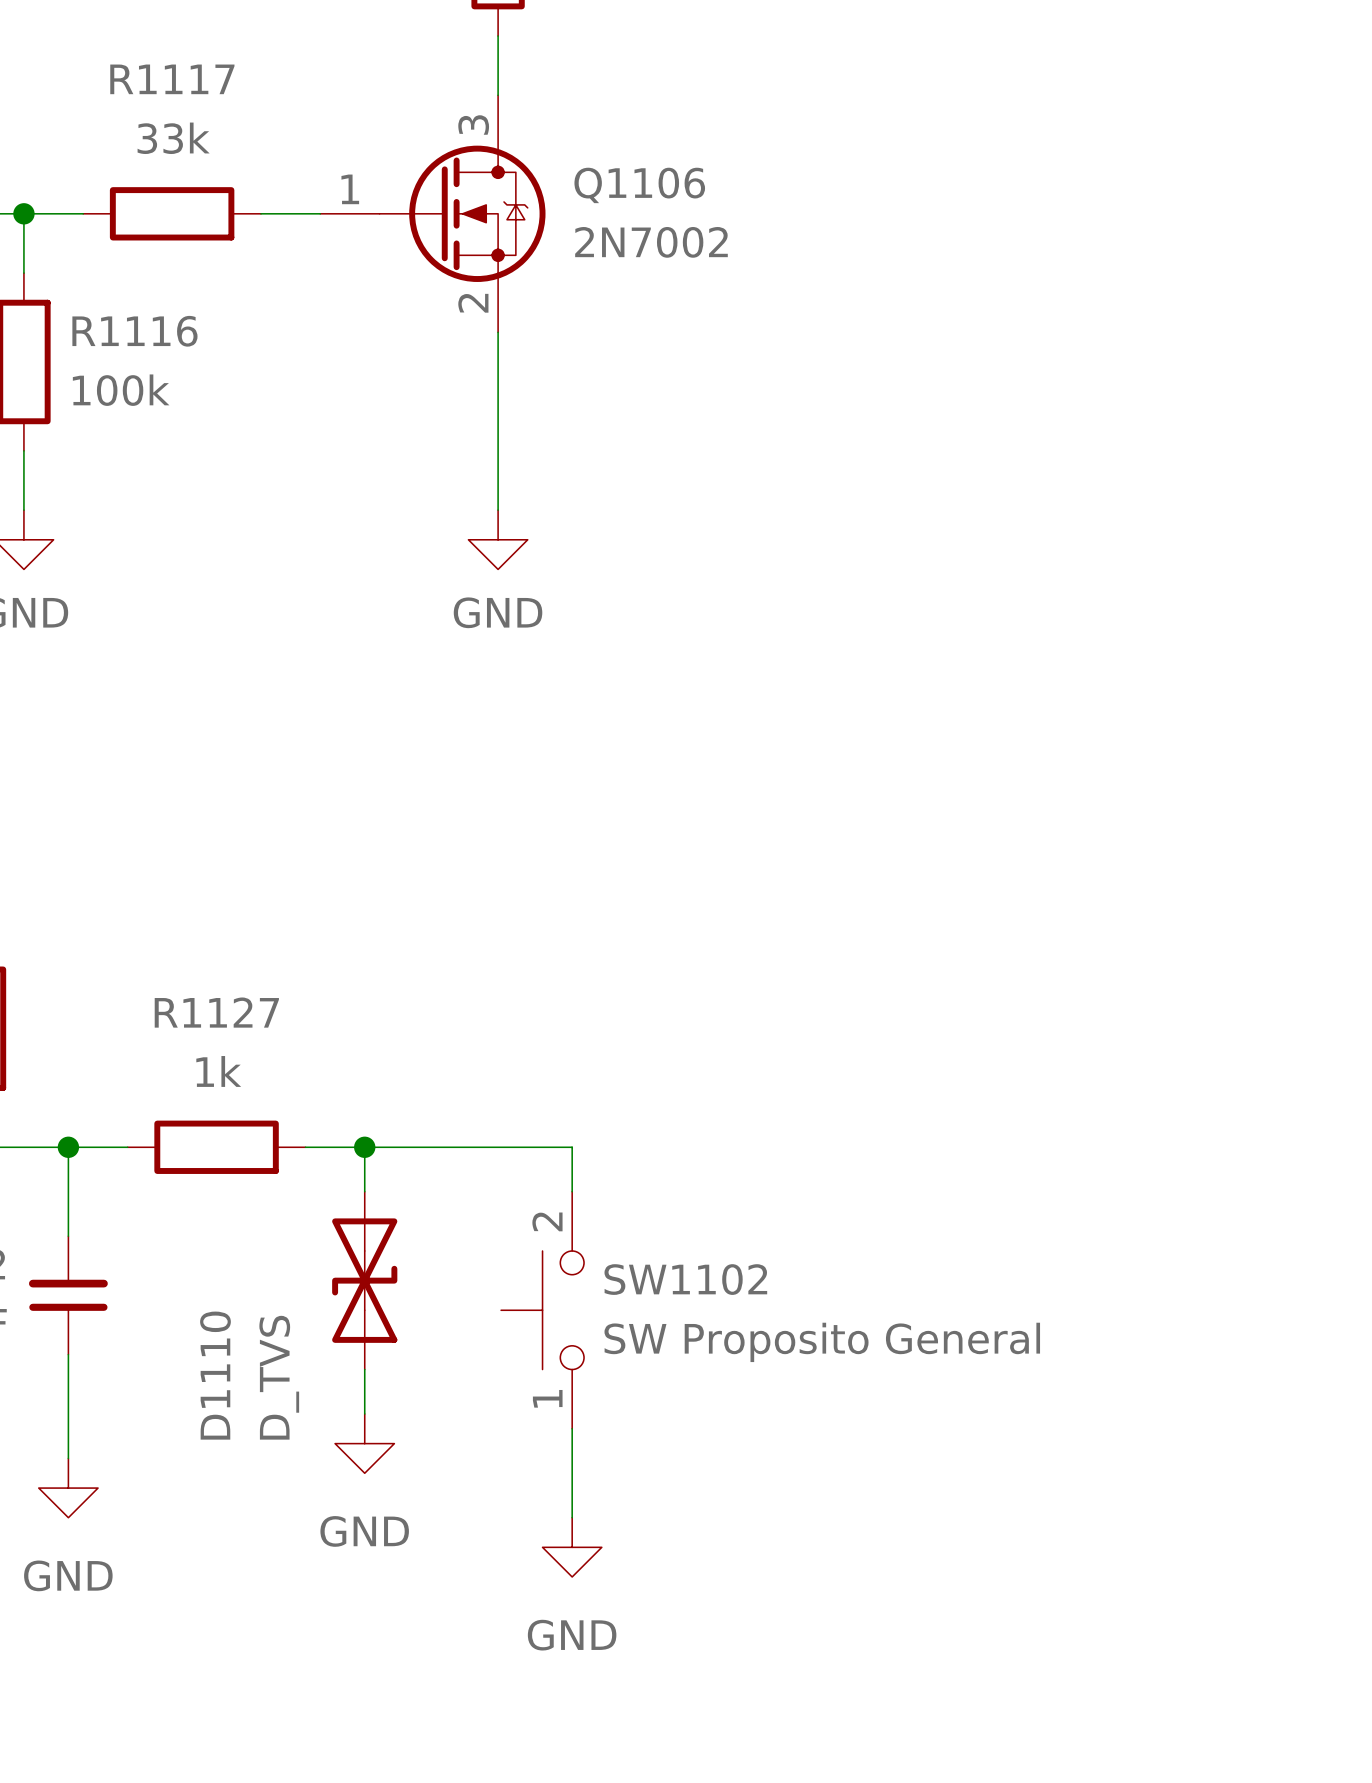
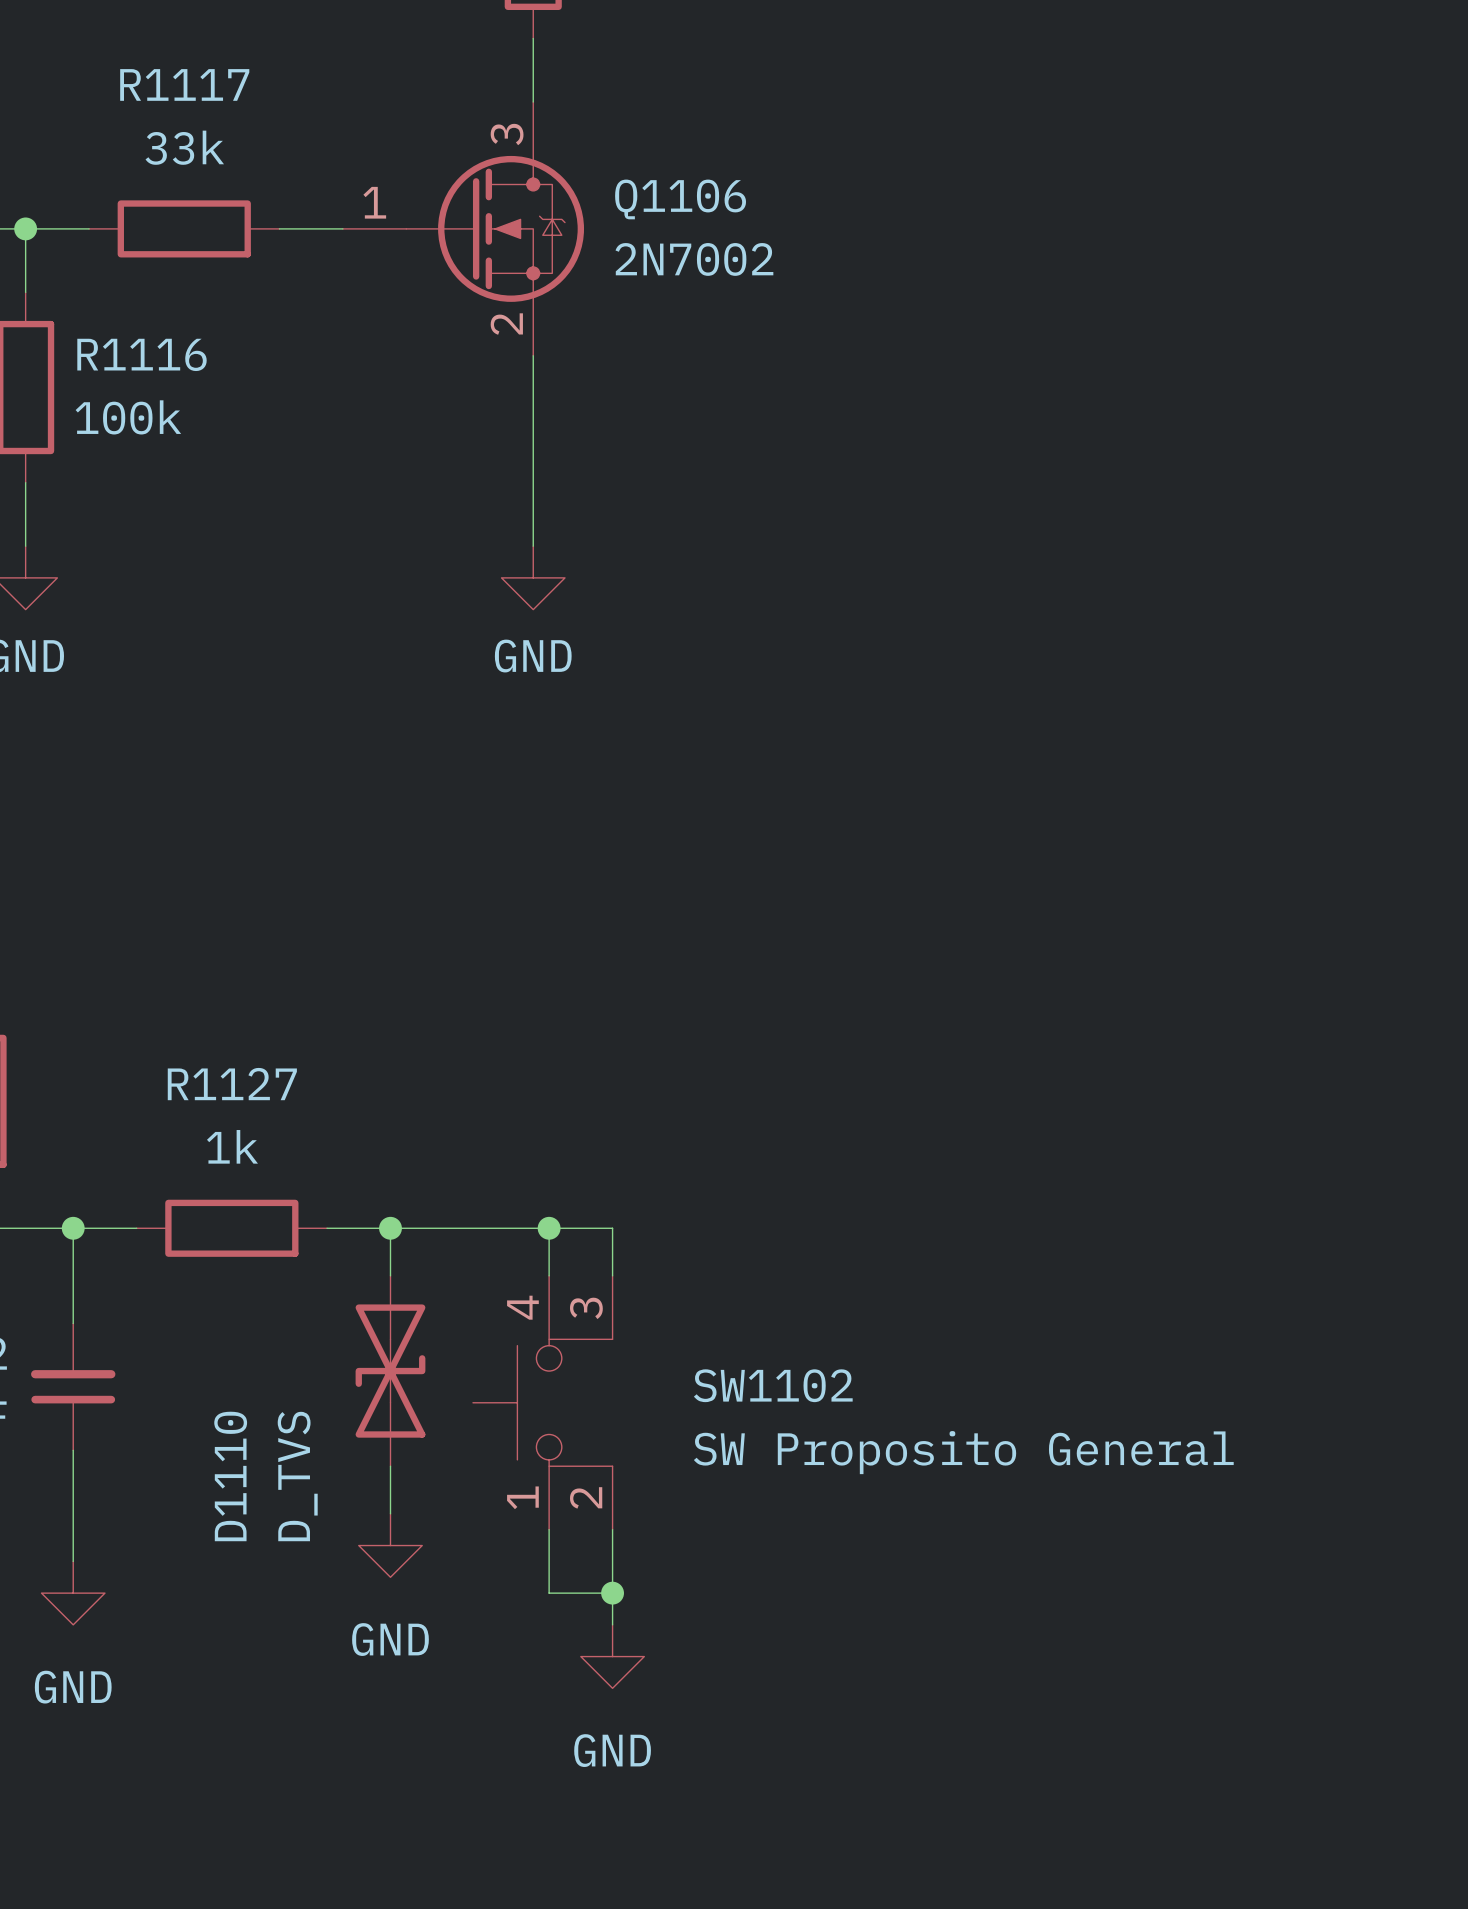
wire: none -> (549, 1228) (549, 1275)
junction: none -> (549, 1228)
SW1102 symbol: [501, 1191, 585, 1429] -> [472, 1275, 613, 1530]
SW1102 name position: SW1102 (685, 1279) -> SW1102 (773, 1385)
SW1102 value position: SW Proposito General (822, 1342) -> SW Proposito General (963, 1452)
wire: none -> (549, 1529) (549, 1593) (612, 1593)
junction: none -> (612, 1593)

